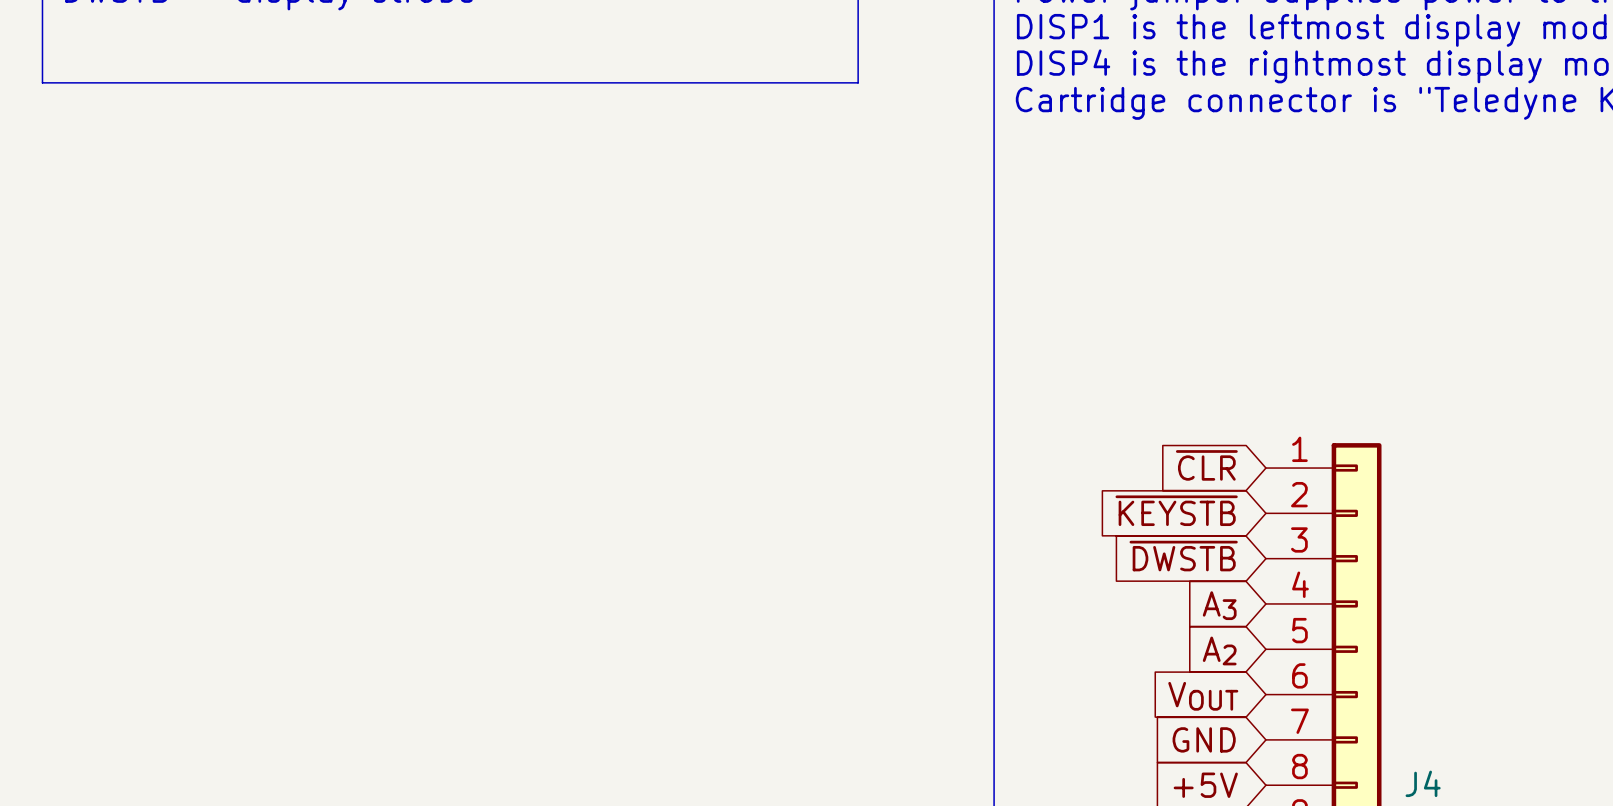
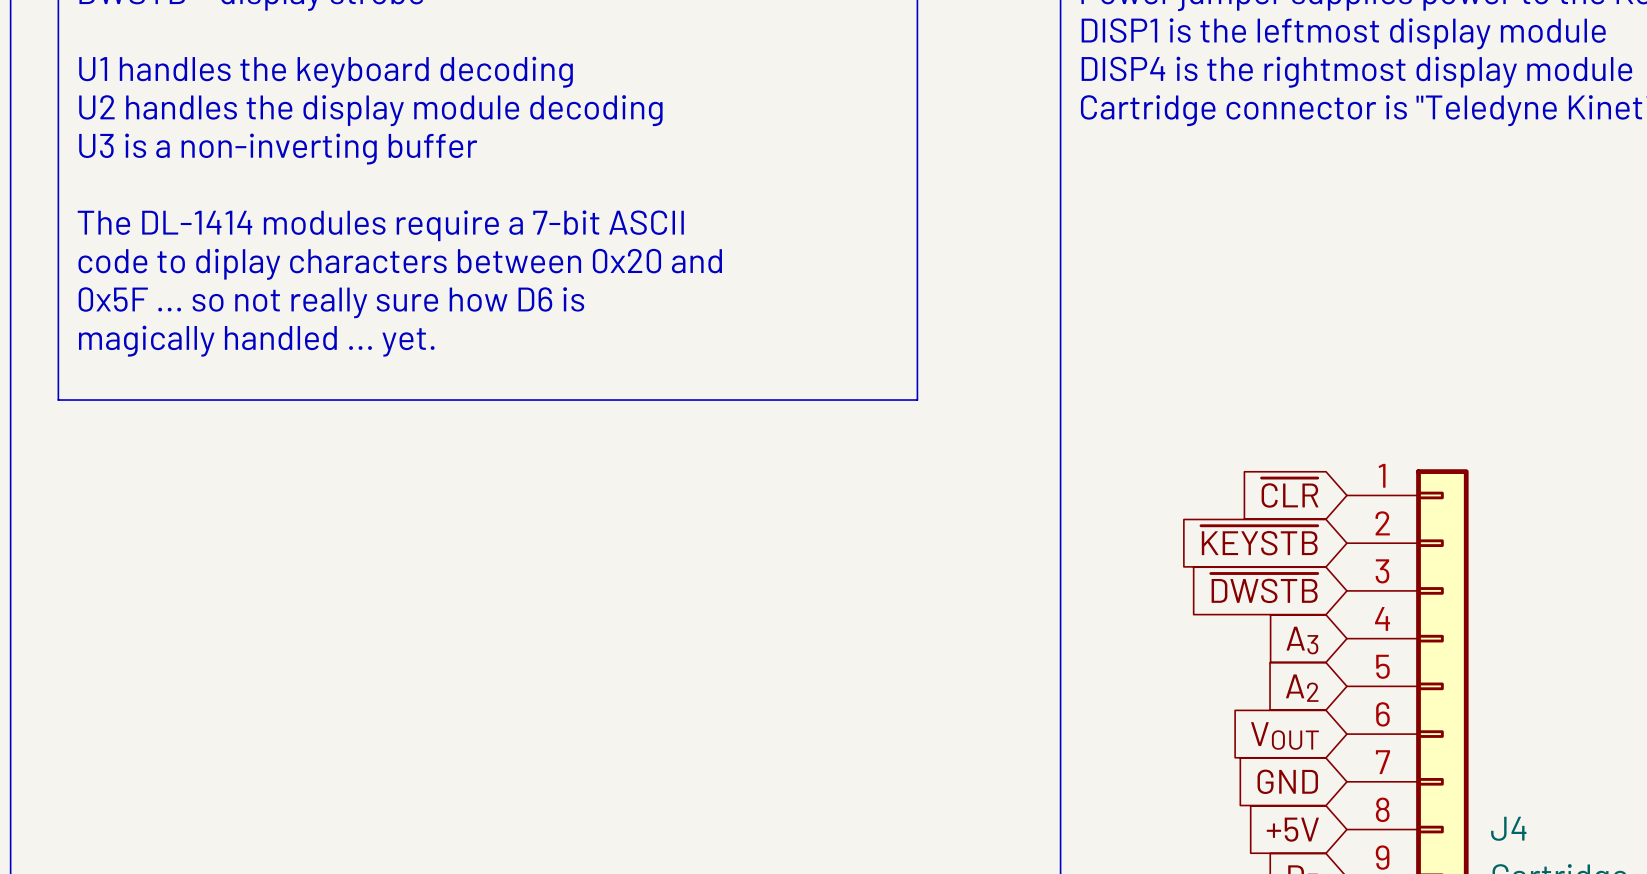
text: none -> U1 handles the keyboard decoding (326, 72)
line: (42, 82) (858, 82) -> (58, 89) (58, 400) (917, 400) (917, 89)
text: none -> U2 handles the display module decoding (370, 110)
text: none -> U3 is a non-inverting buffer (278, 149)
text: none -> The DL-1414 modules require a 7-bit ASCII (380, 225)
text: none -> code to diplay characters between 0x20 and (400, 264)
text: none -> 0x5F ... so not really sure how D6 is (331, 302)
text: none -> magically handled ... yet. (256, 341)

